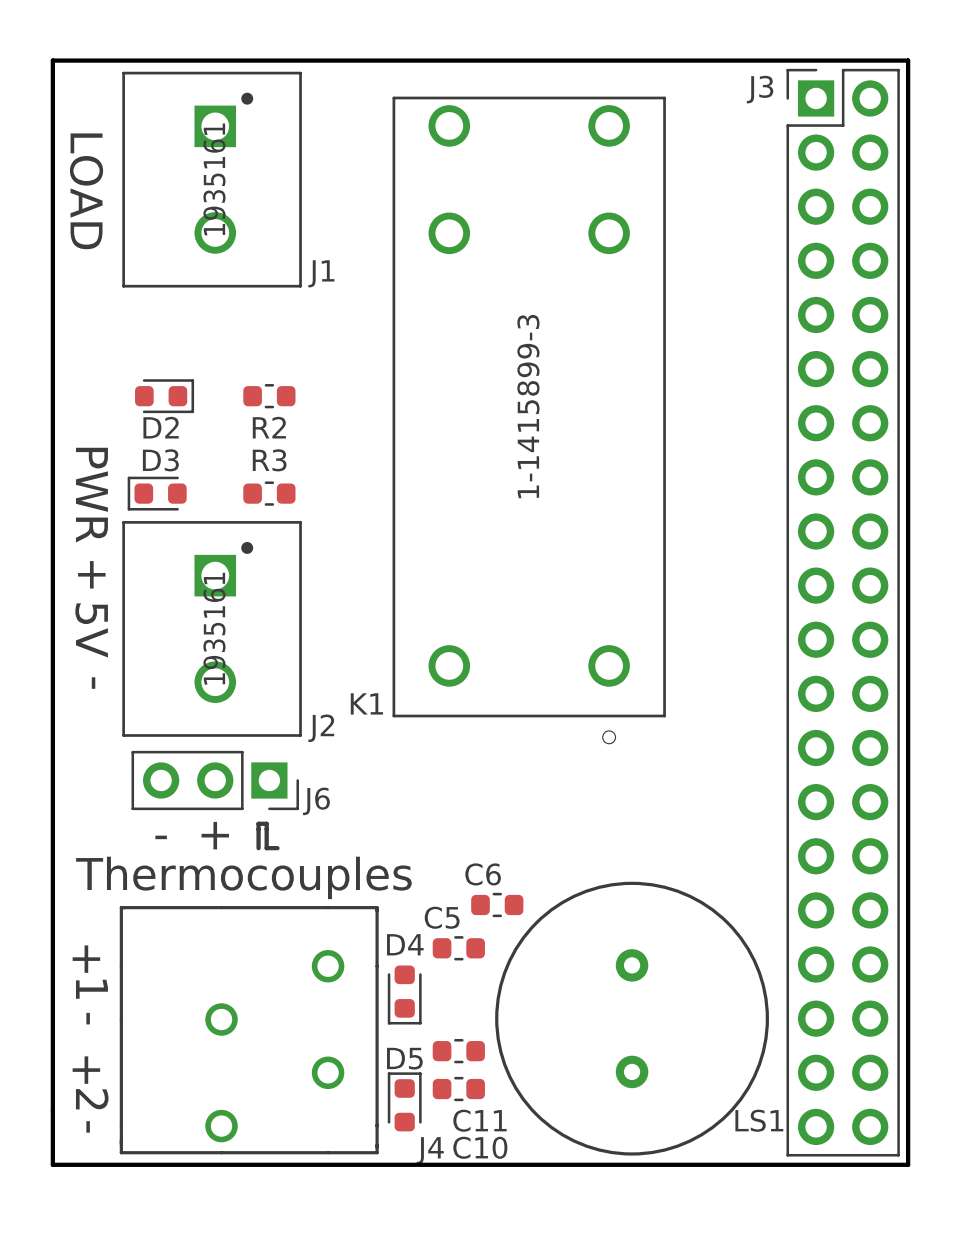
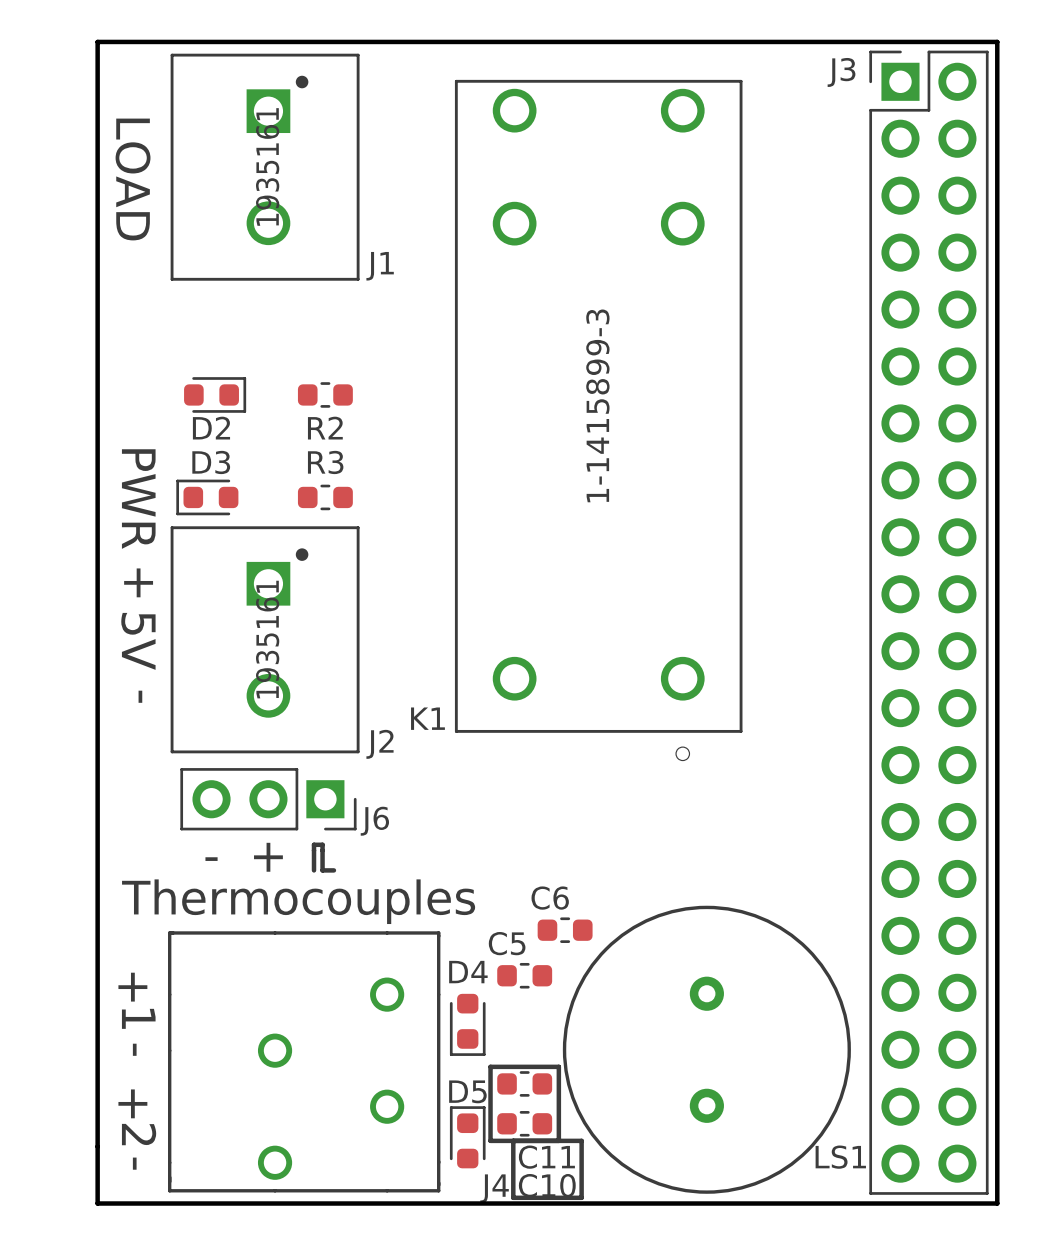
line: none -> (513, 1140) (513, 1197) (581, 1197) (581, 1140) (490, 1140) (490, 1066) (558, 1066) (558, 1140)

